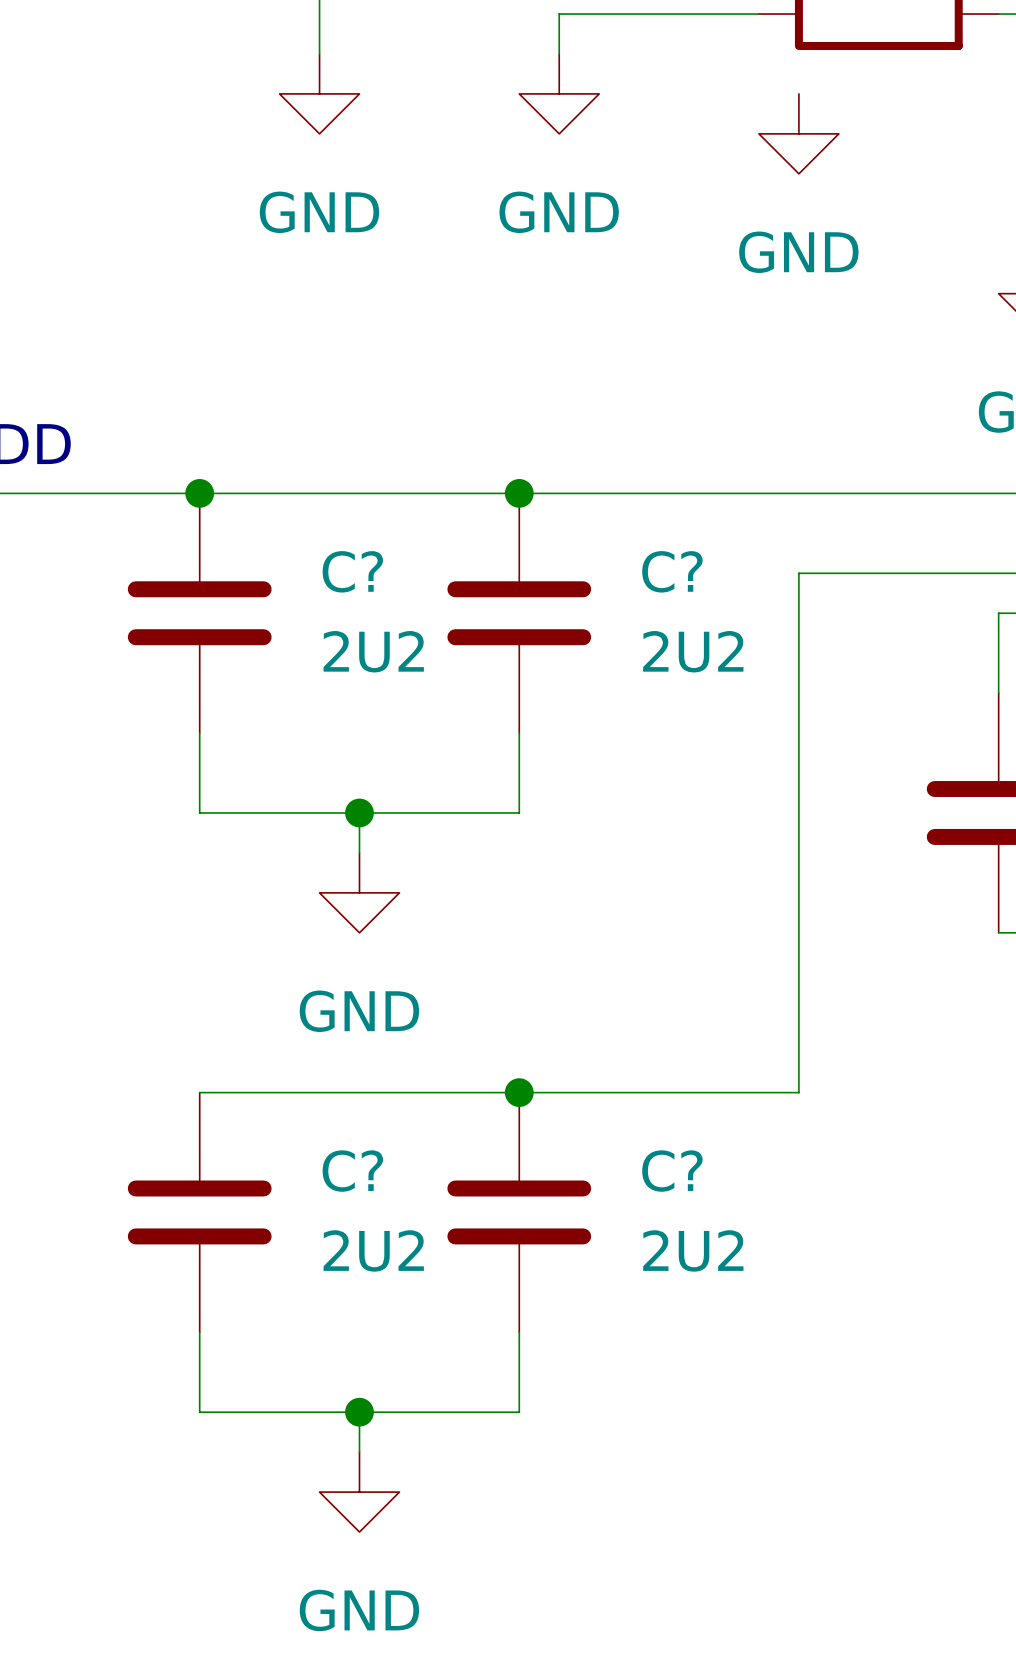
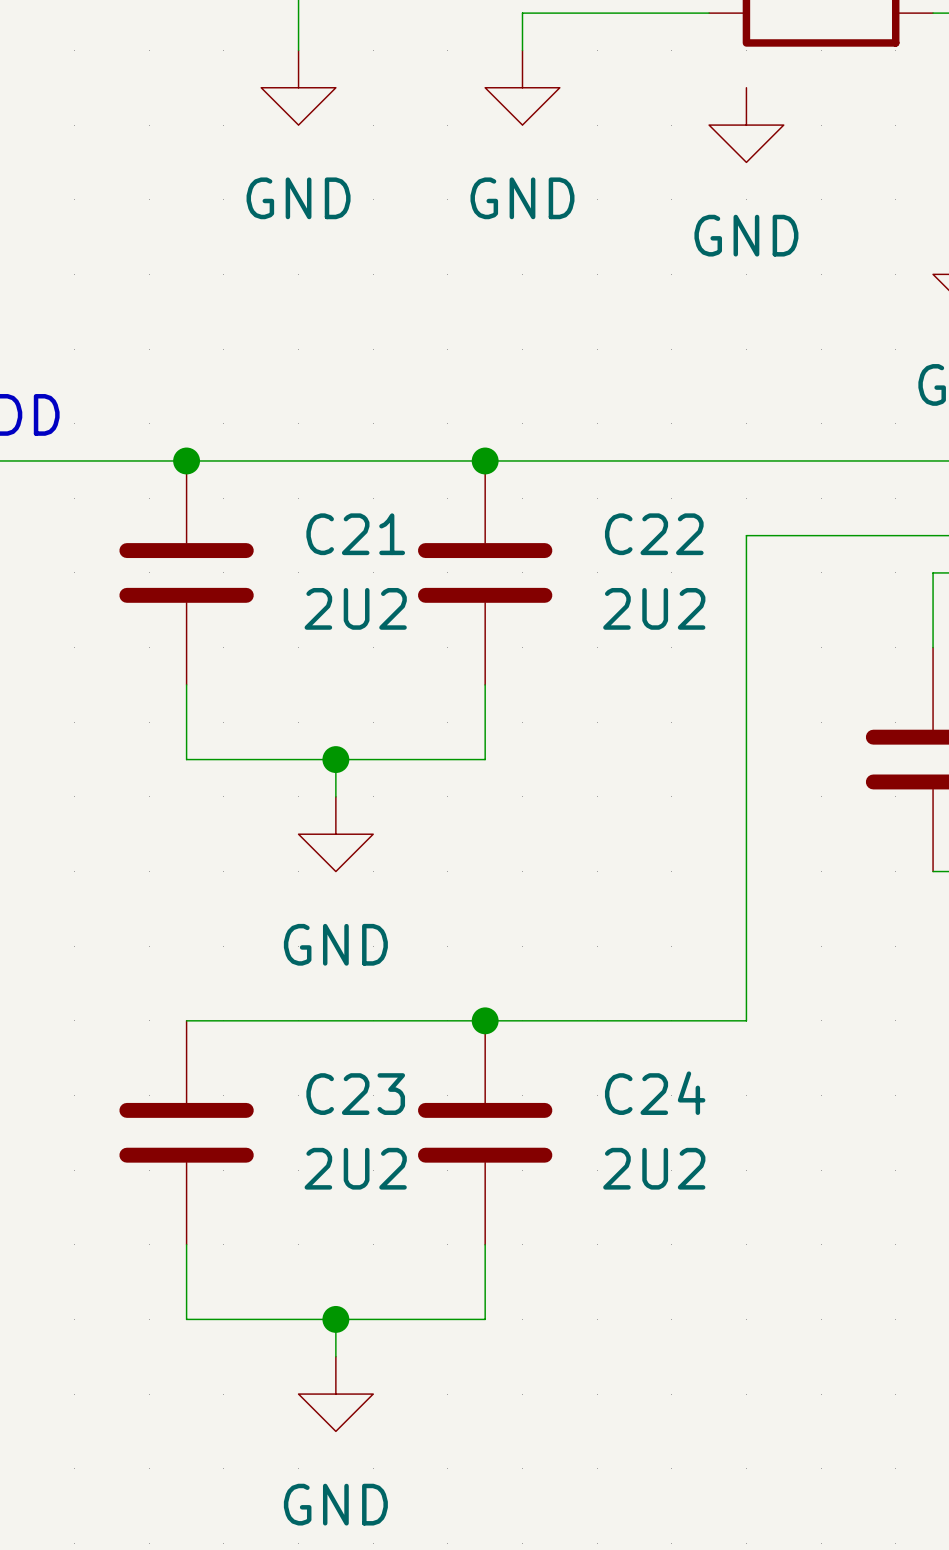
C? name: C? (352, 571) -> C21 (355, 534)
C? name: C? (672, 571) -> C22 (654, 534)
C? name: C? (352, 1171) -> C23 (355, 1094)
C? name: C? (672, 1171) -> C24 (655, 1093)

